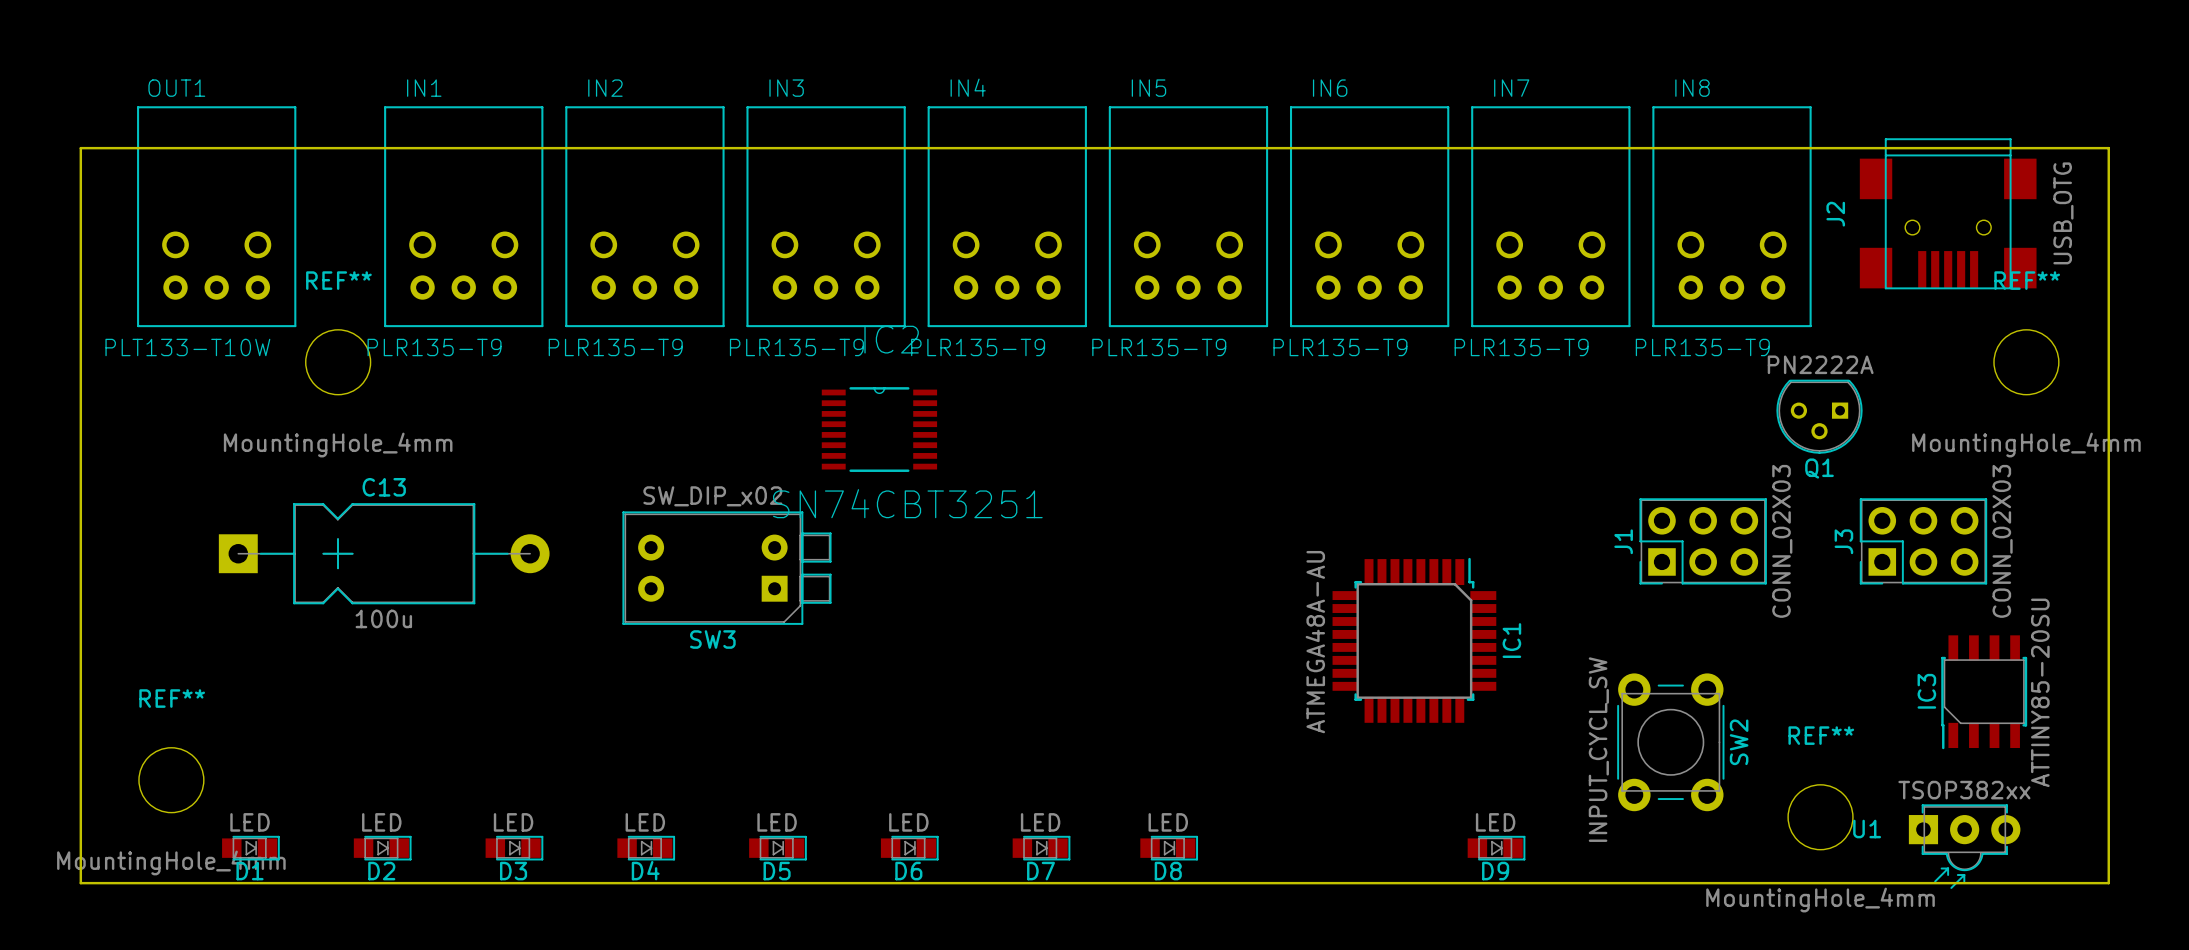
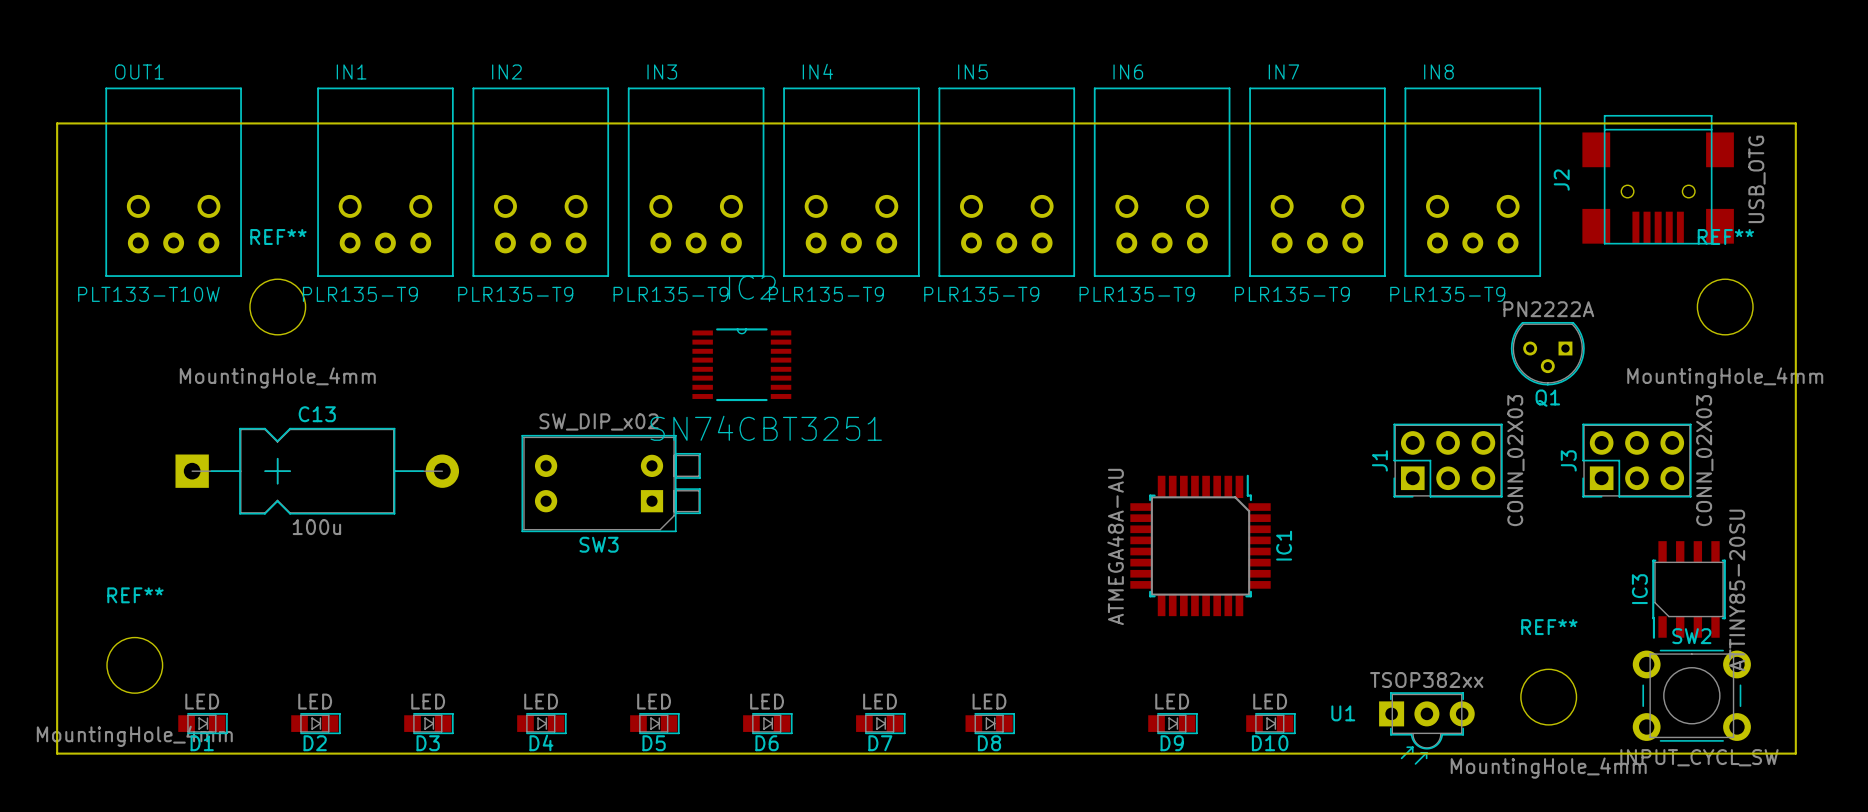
SW2 rotation: 0° (1670, 742) -> 90° counterclockwise (1691, 695)
SW2 position: (1670, 742) -> (1691, 695)
U1 position: (1964, 846) -> (1426, 728)
D9: none -> LED (1172, 723)
D9 name: D9 (1495, 871) -> D10 (1270, 743)

